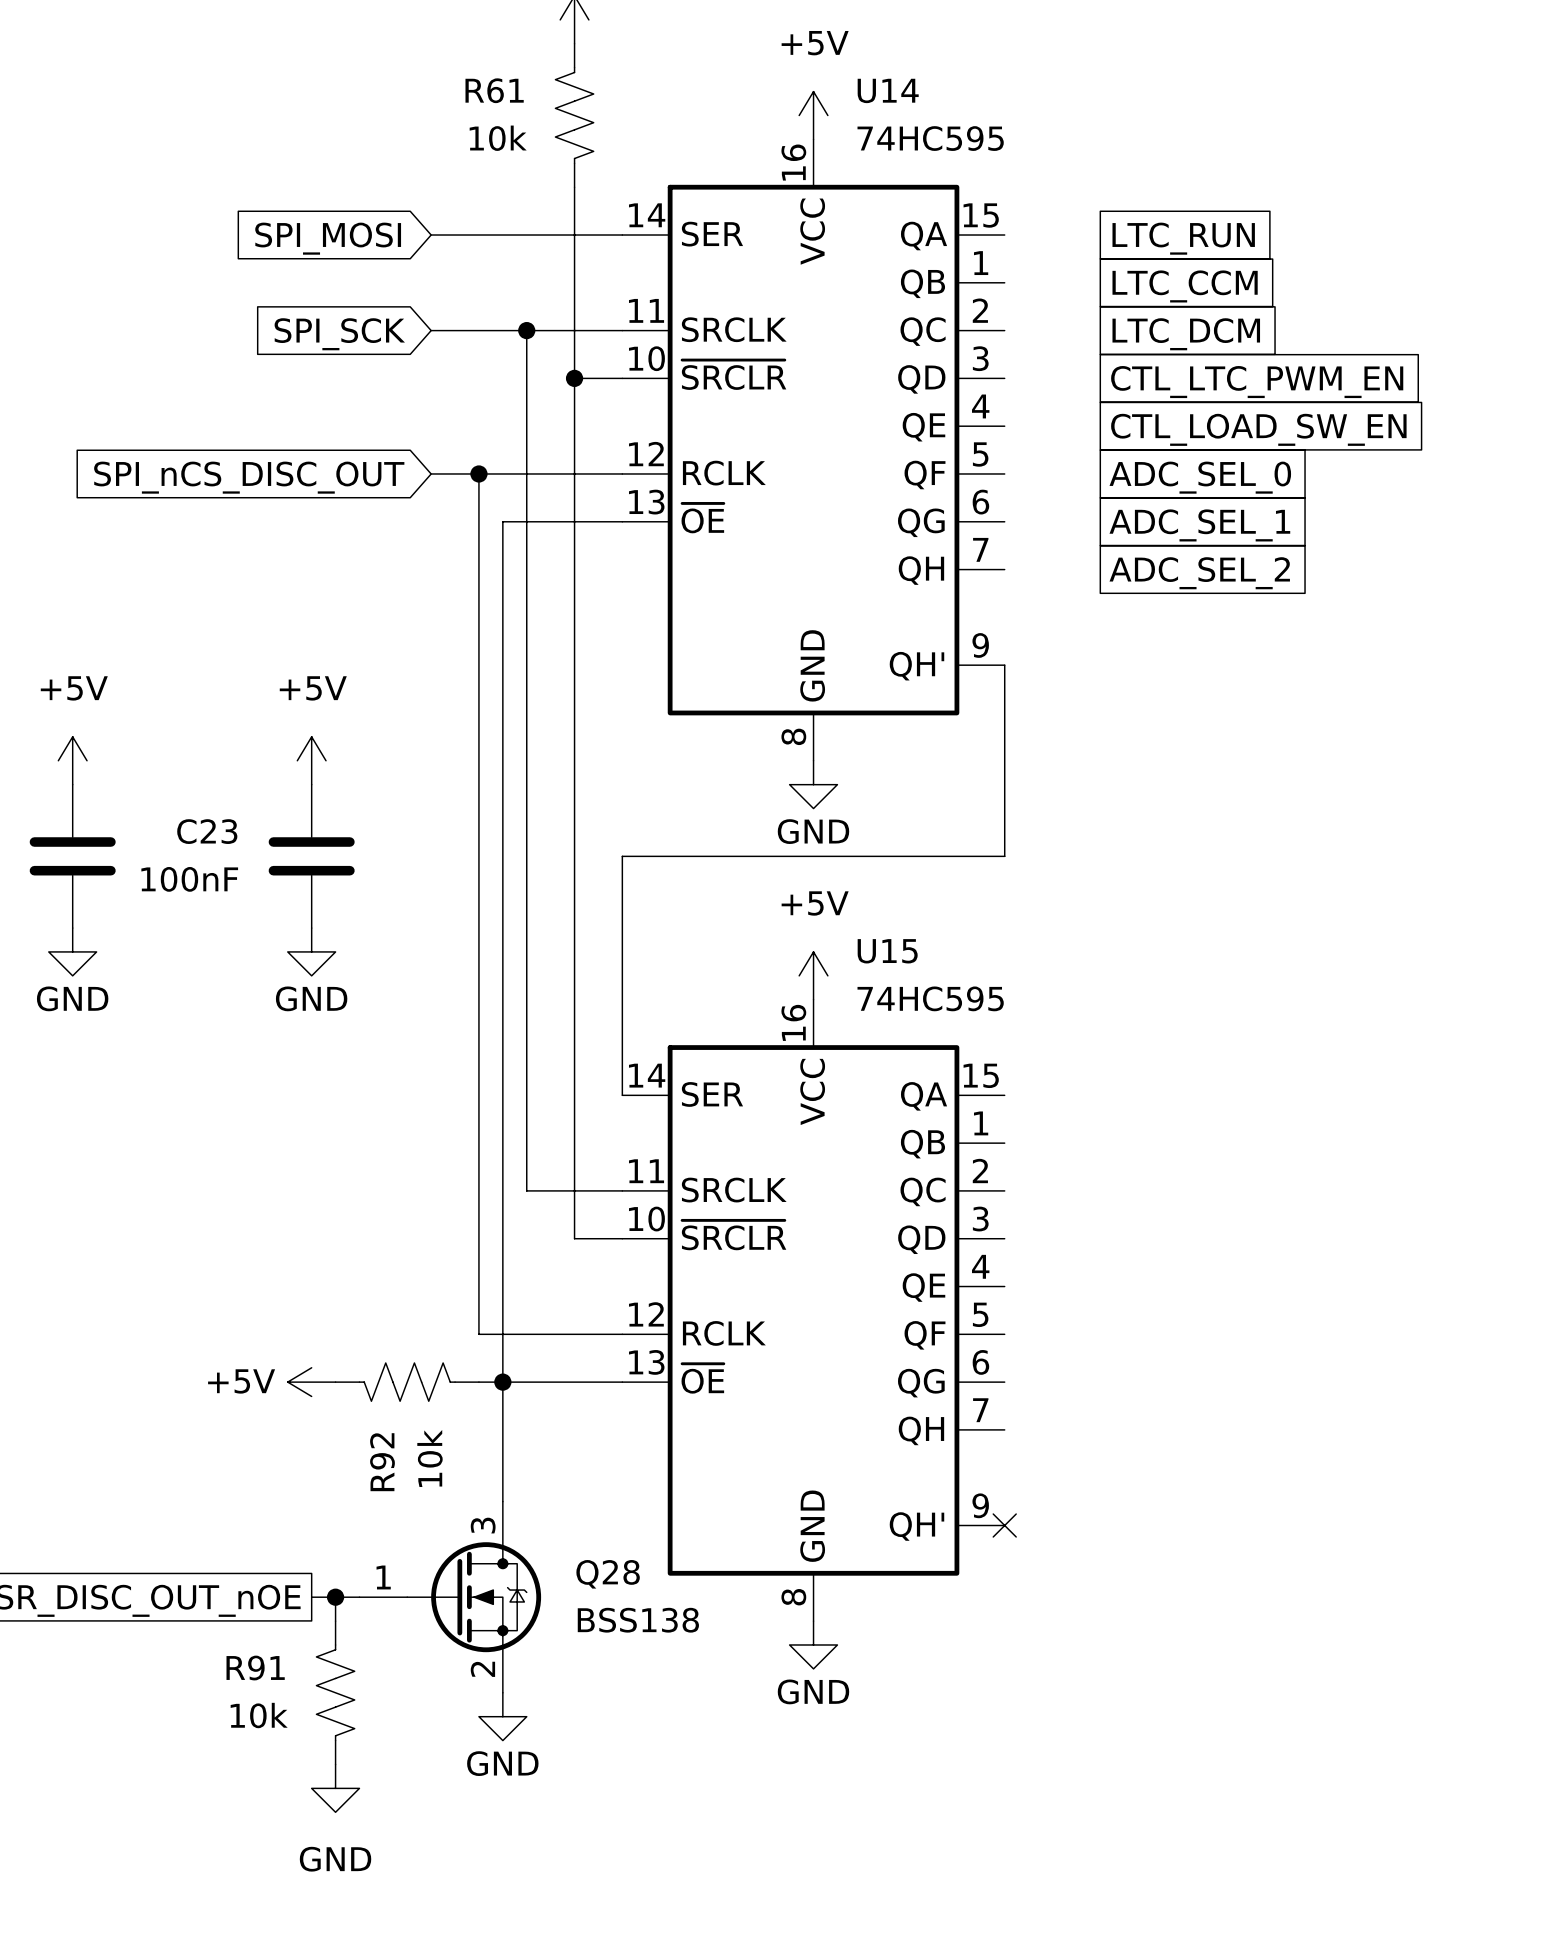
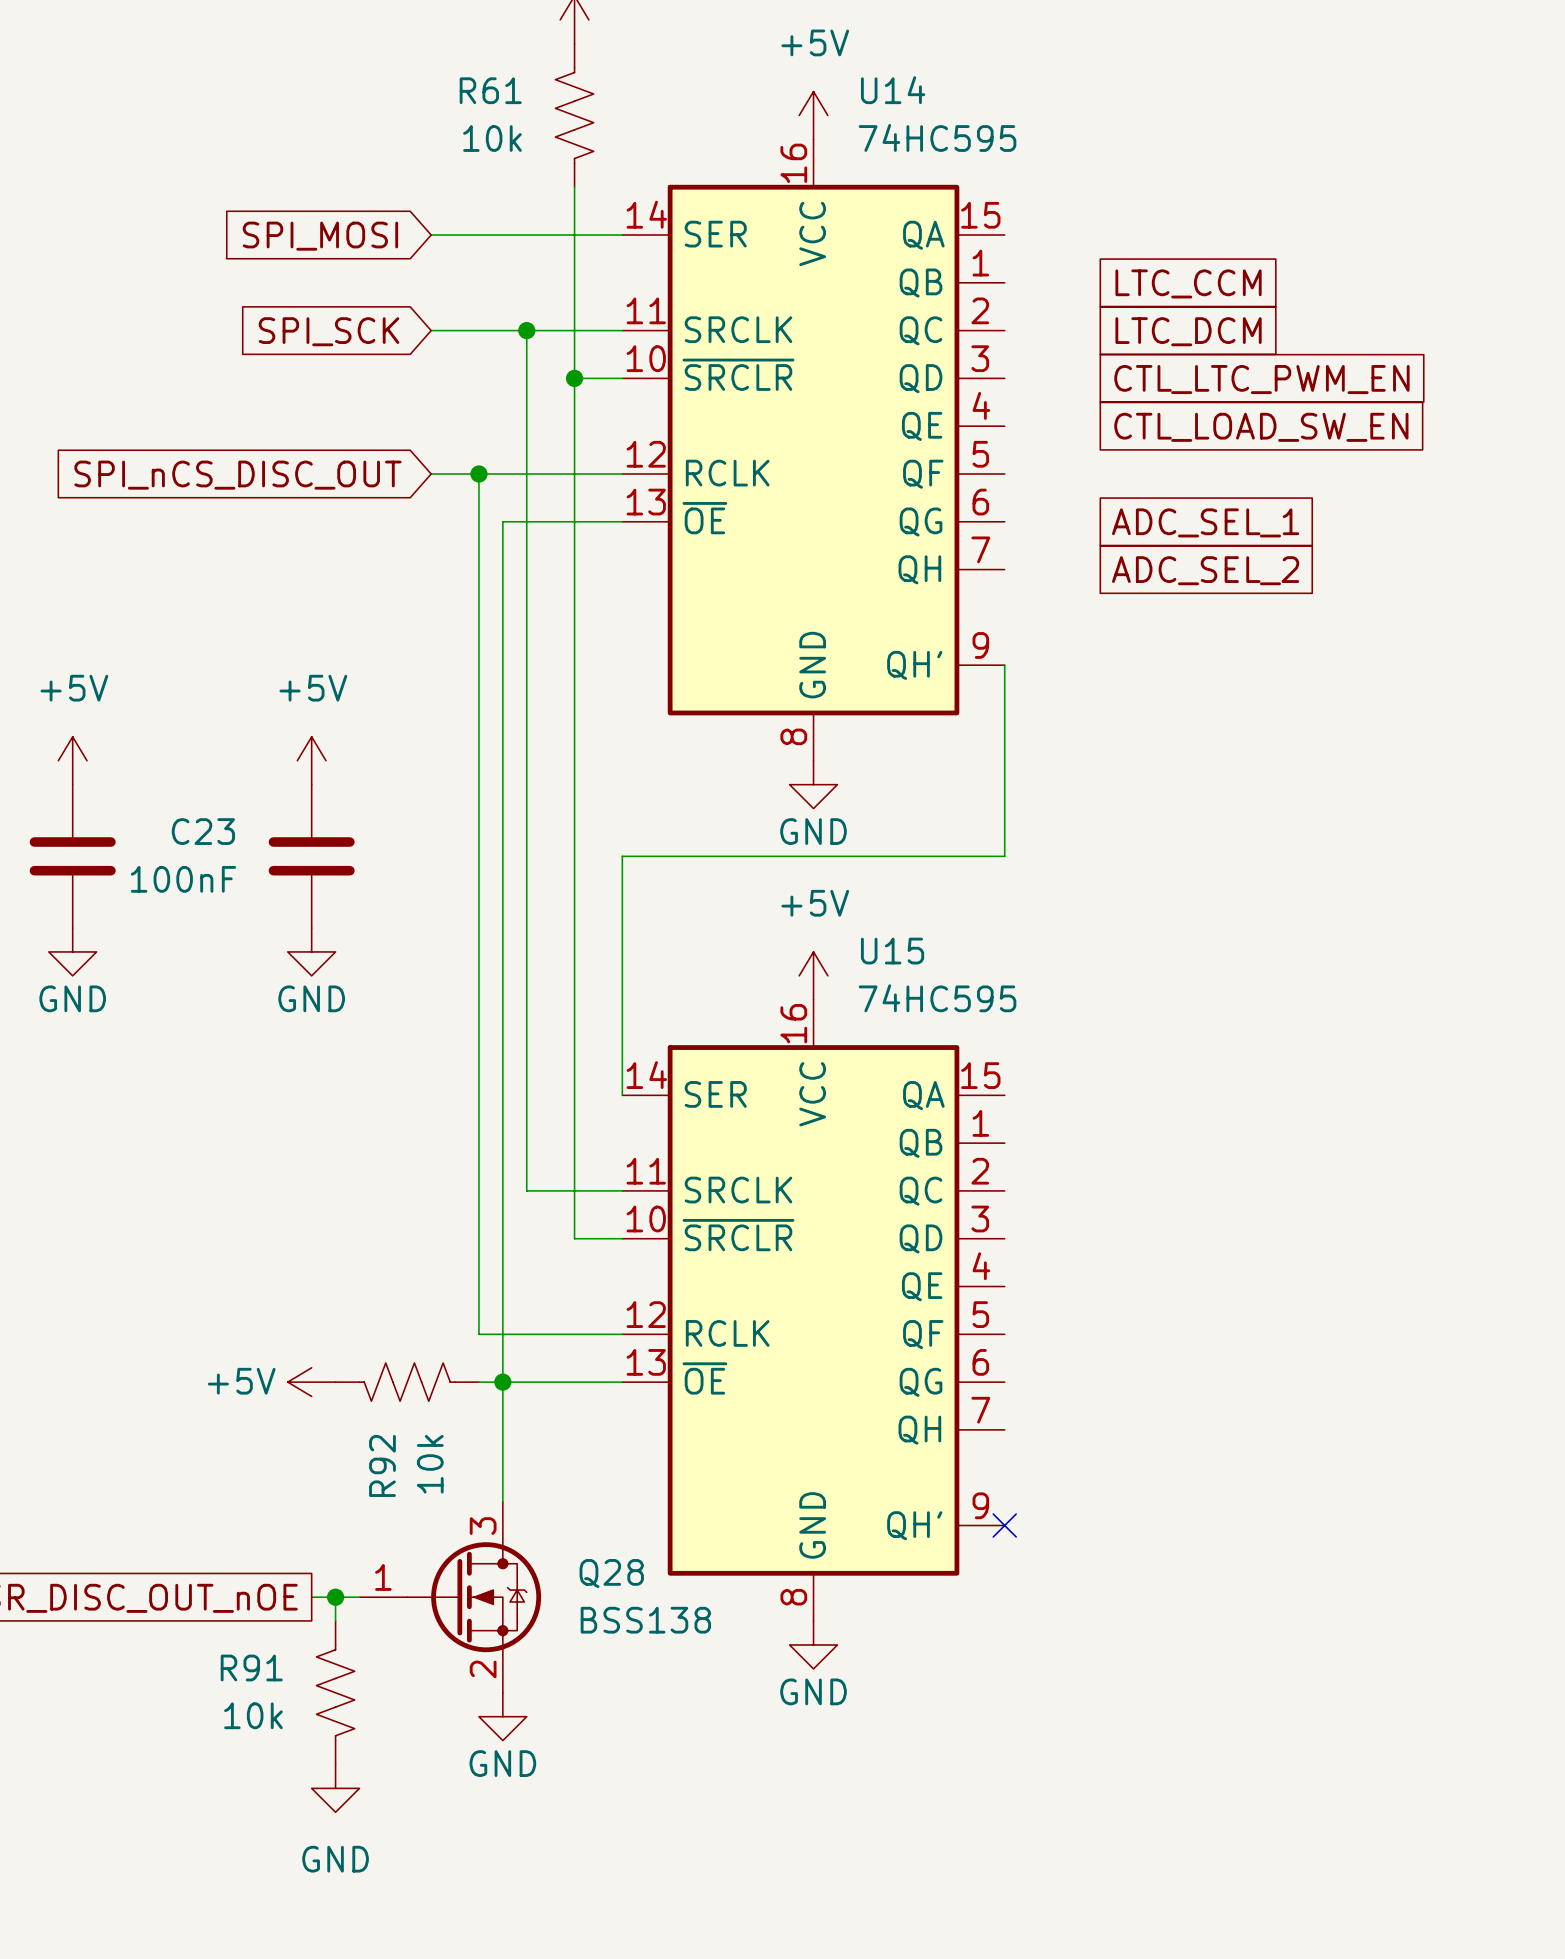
global label: LTC_RUN (1183, 238) -> none
global label: ADC_SEL_0 (1200, 477) -> none

